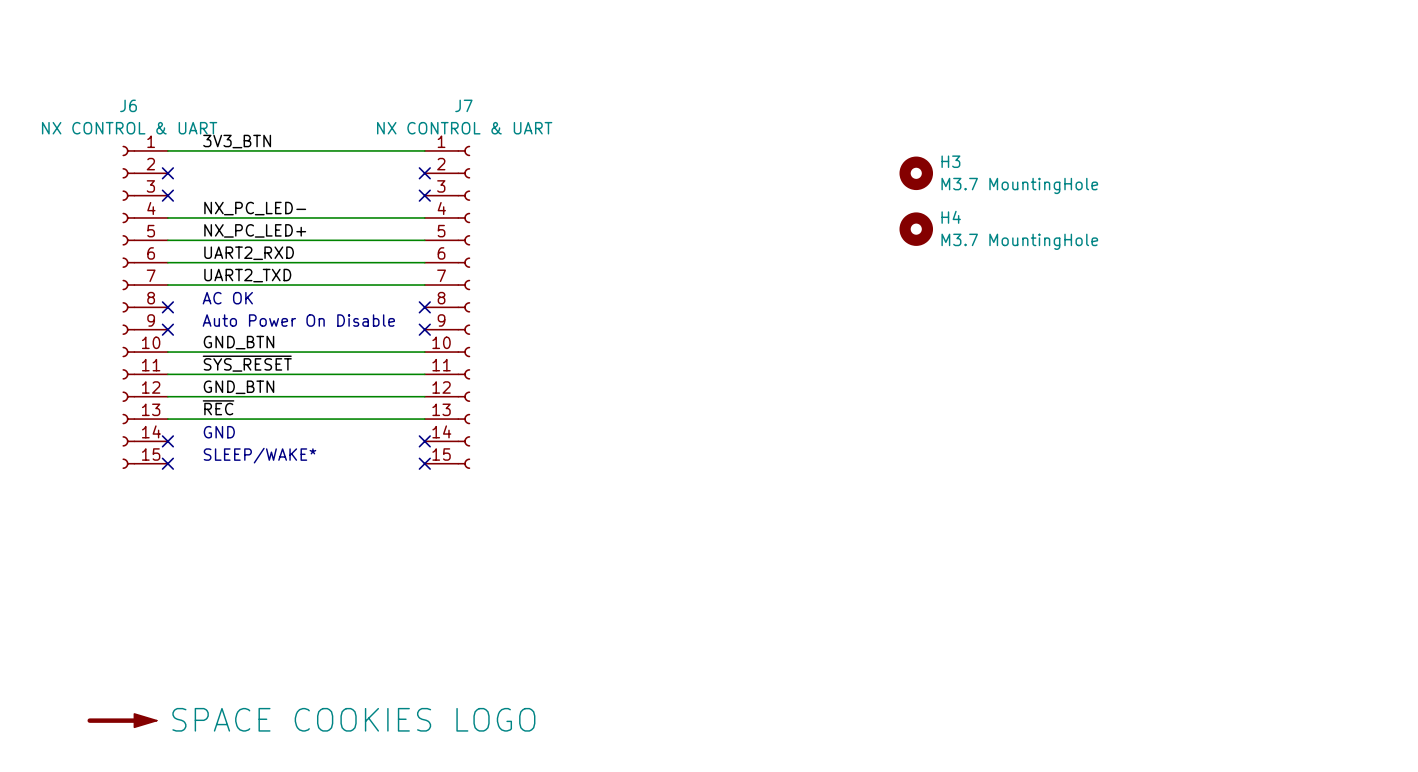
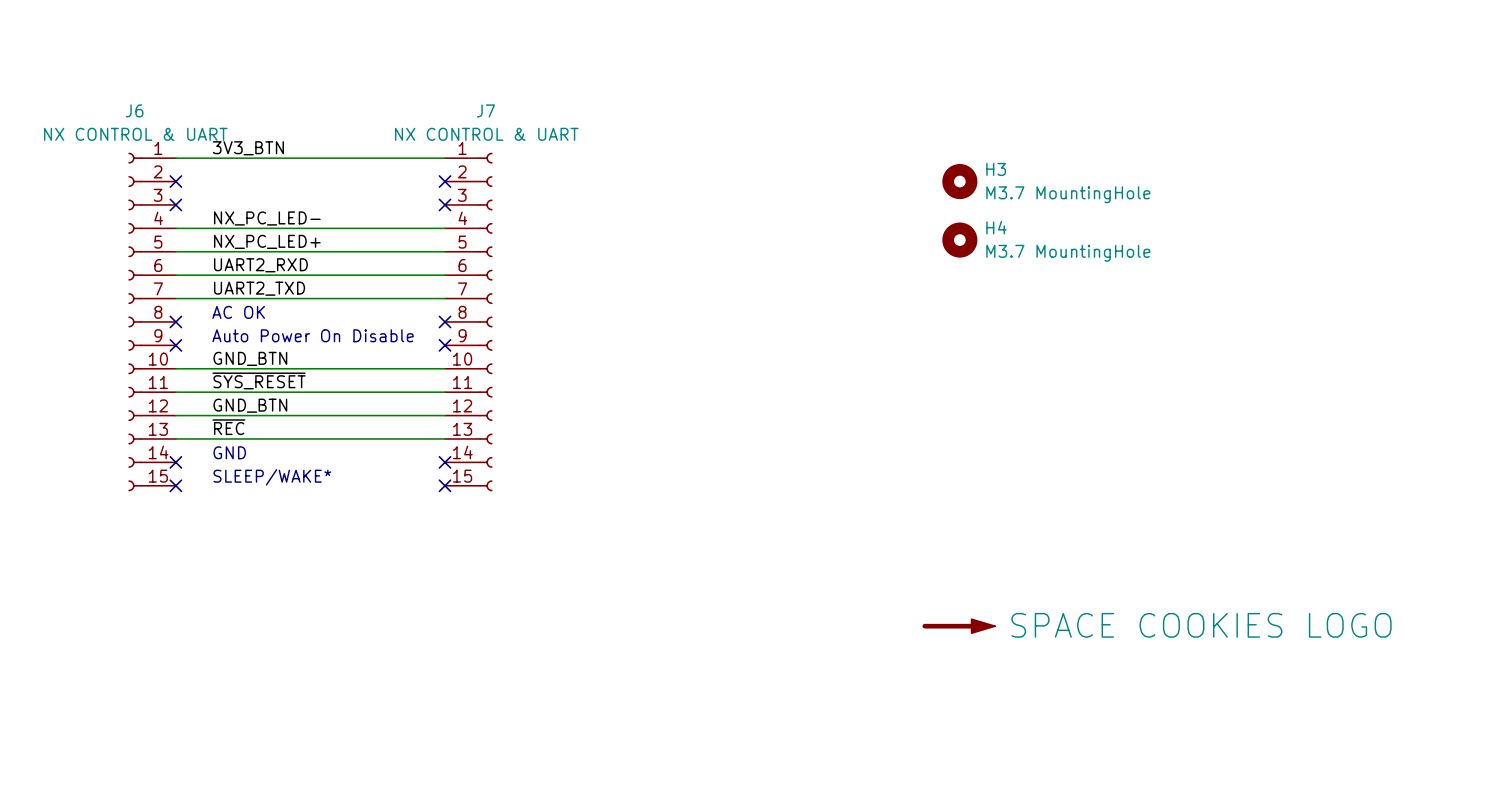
part: none -> SPACE COOKIES LOGO (958, 626)
part: SPACE COOKIES LOGO (122, 720) -> none

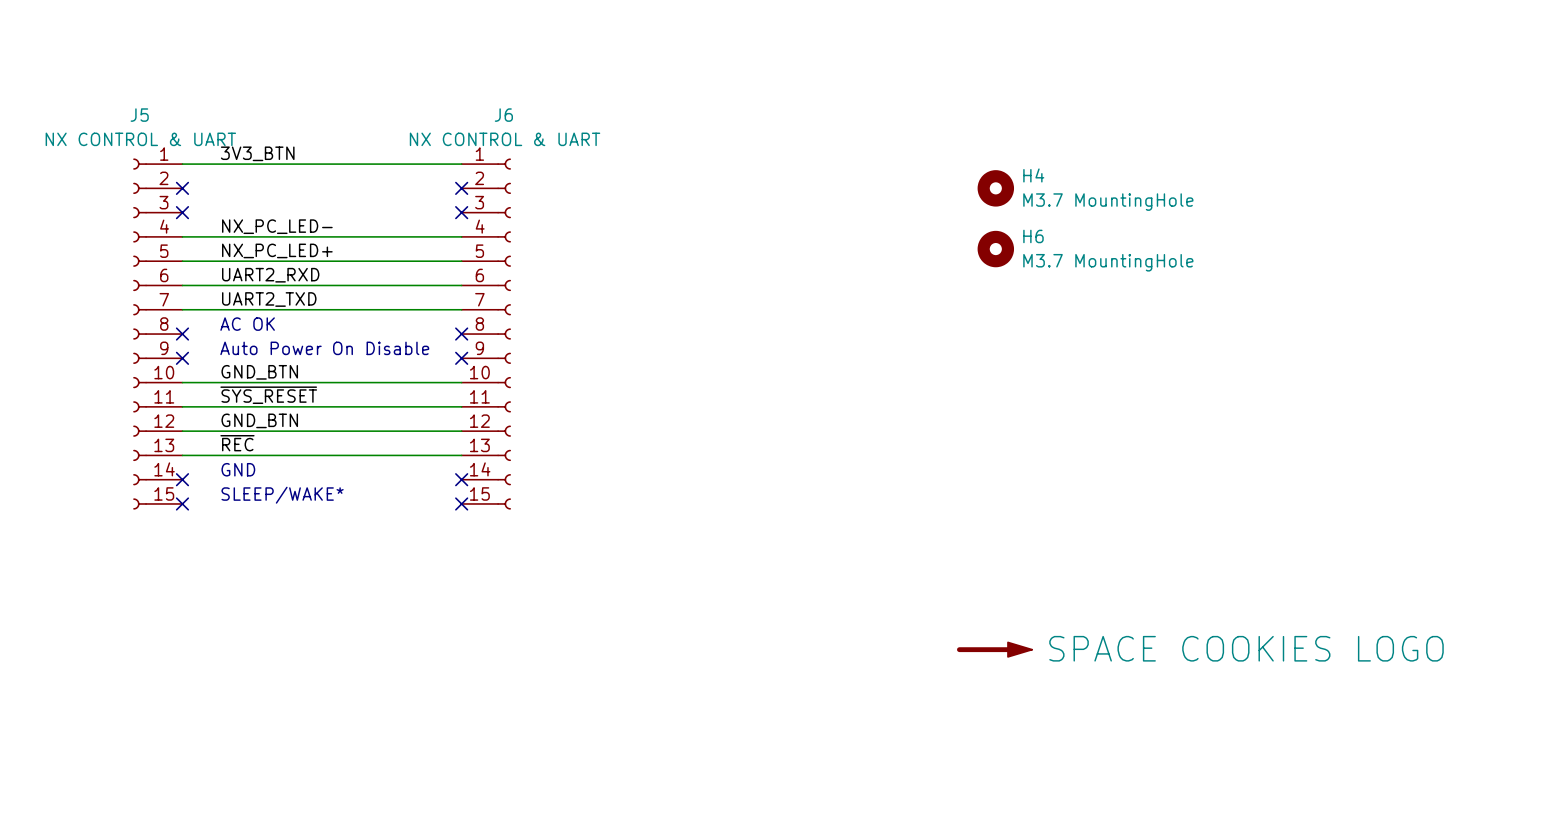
J6 name: J6 (134, 110) -> J5 (139, 115)
J7 name: J7 (485, 110) -> J6 (503, 115)
H3 name: H3 (996, 169) -> H4 (1033, 175)
H4 name: H4 (996, 227) -> H6 (1033, 236)

